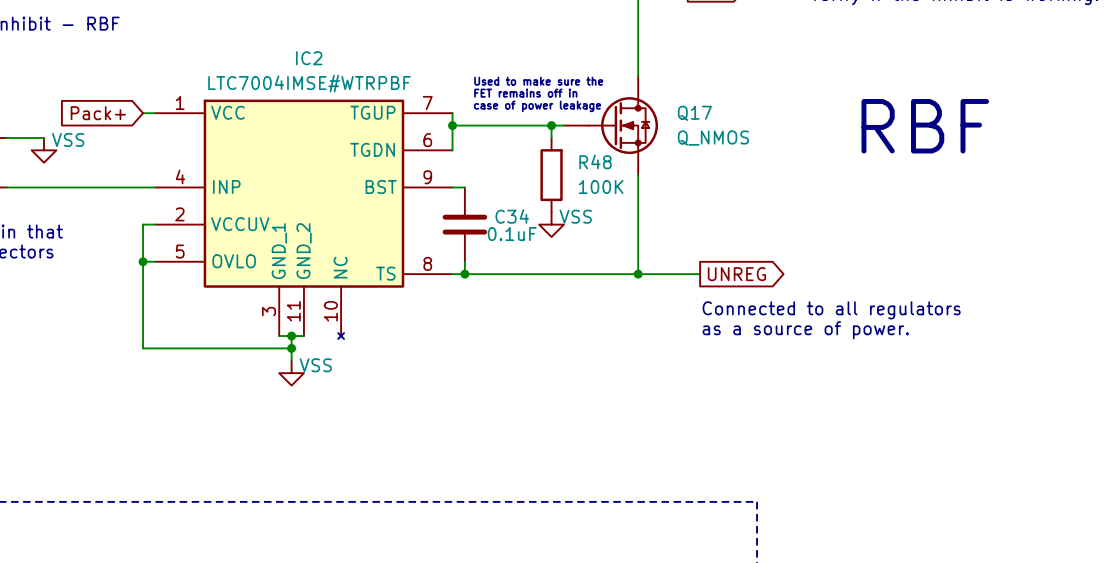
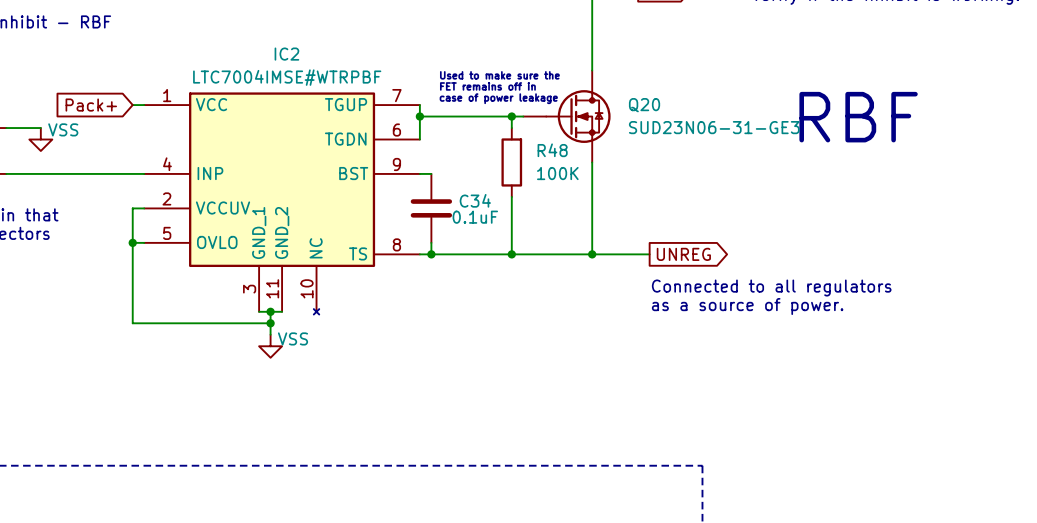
Q17 name: Q17 (694, 113) -> Q20 (644, 105)
Q17 value: Q_NMOS (713, 138) -> SUD23N06-31-GE3 (714, 127)
wire: none -> (511, 196) (511, 254)
power symbol: VSS (551, 224) -> none
junction: none -> (511, 254)

